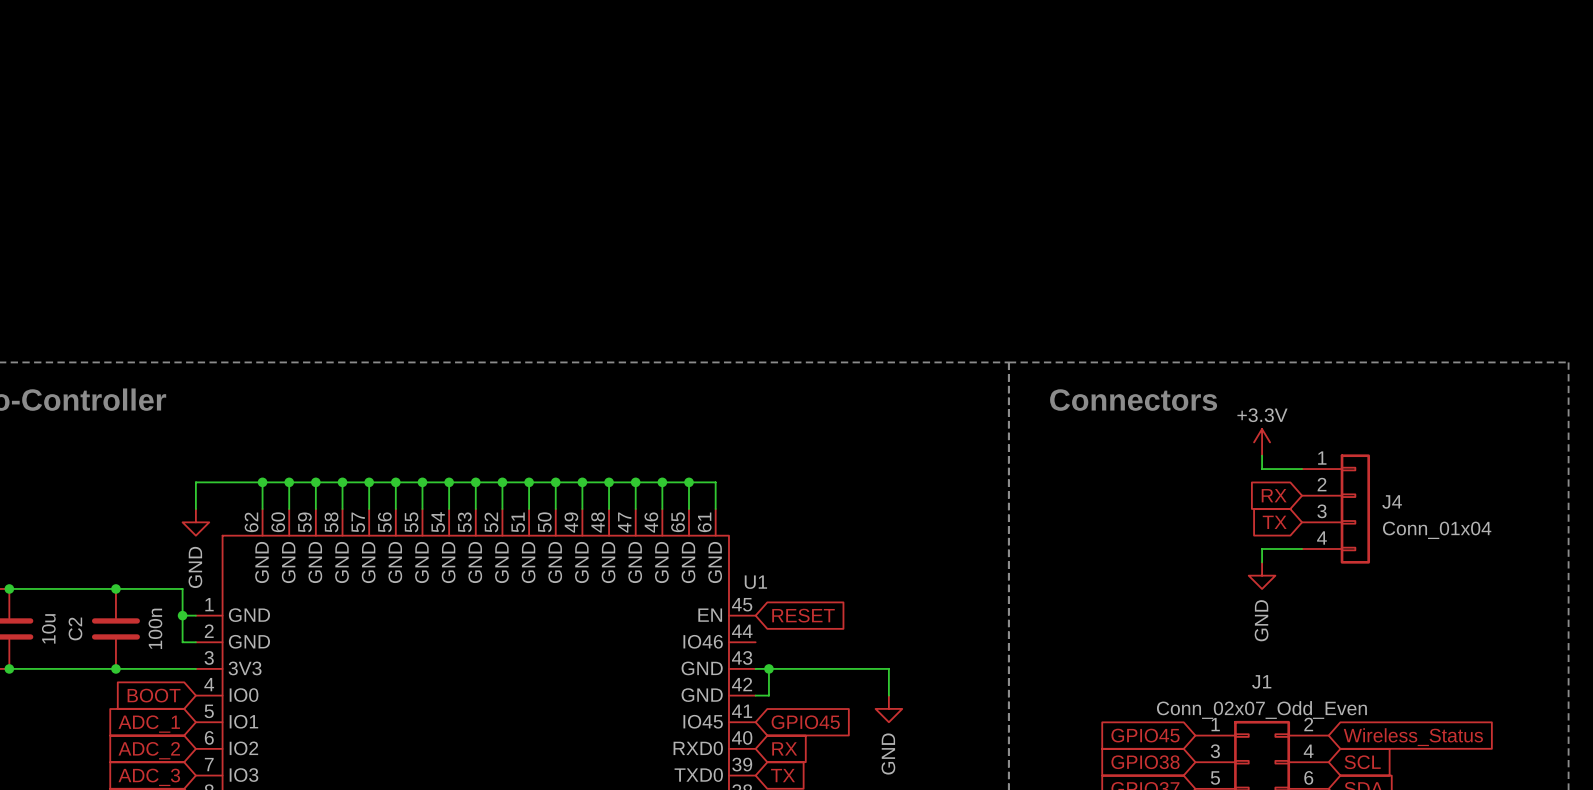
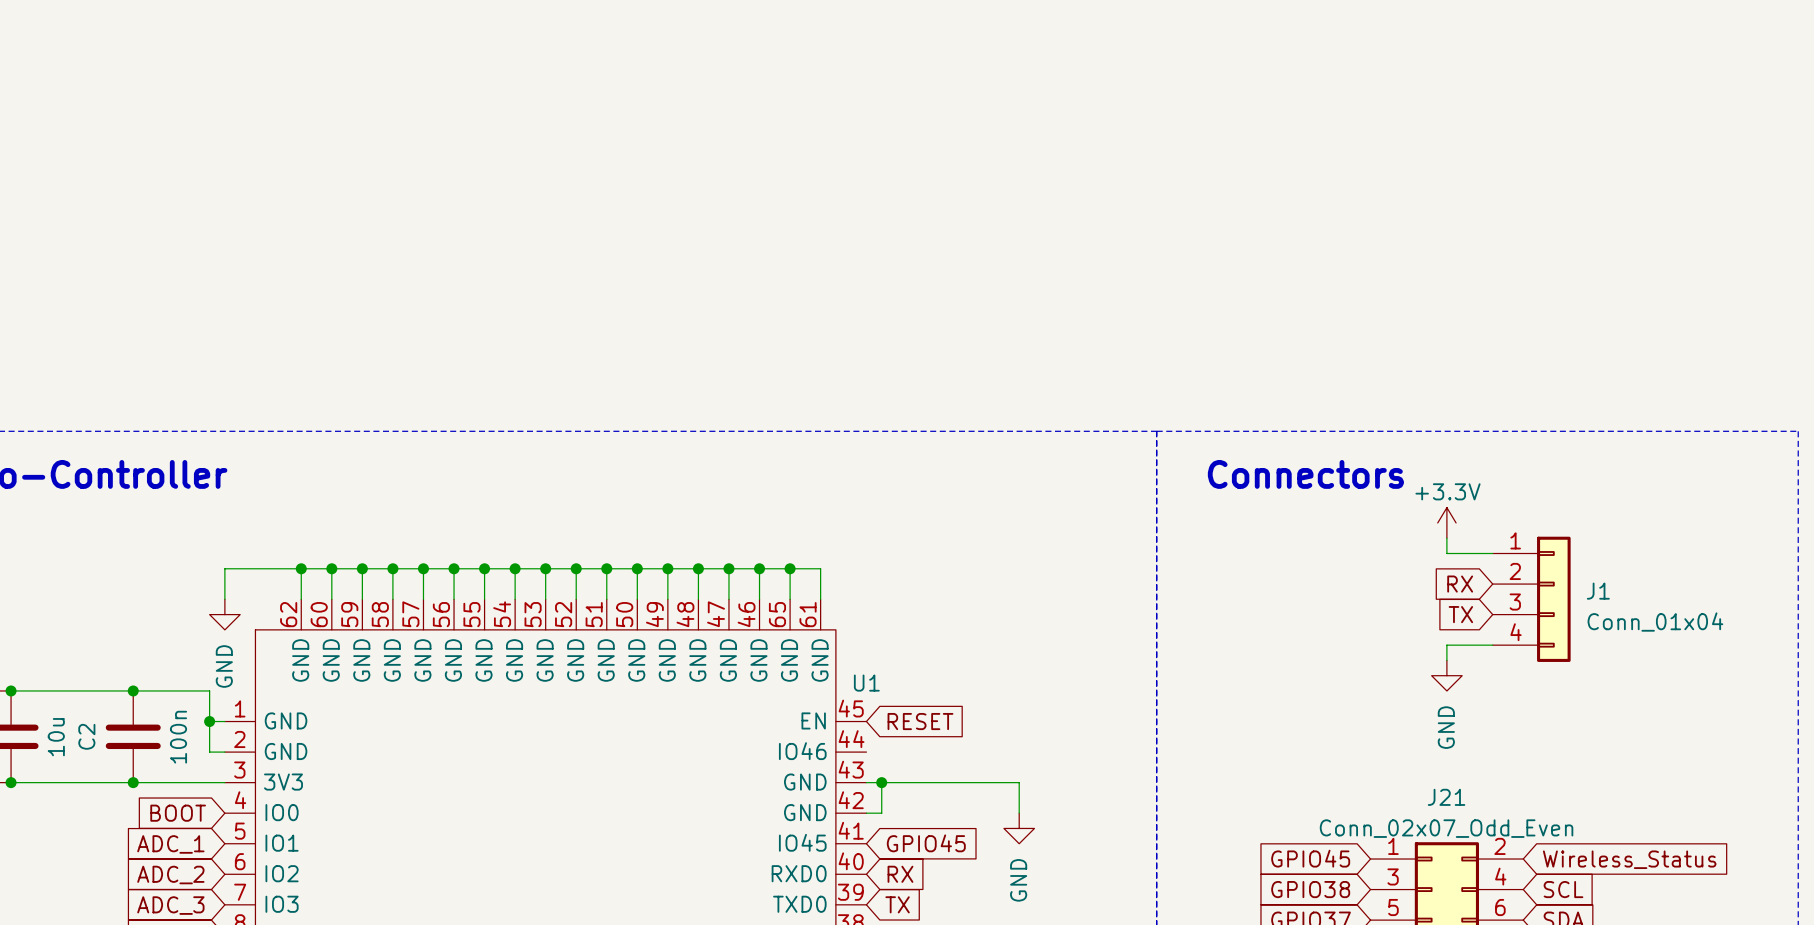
J4 name: J4 (1392, 501) -> J1 (1598, 591)
J1 name: J1 (1261, 681) -> J21 (1446, 797)

